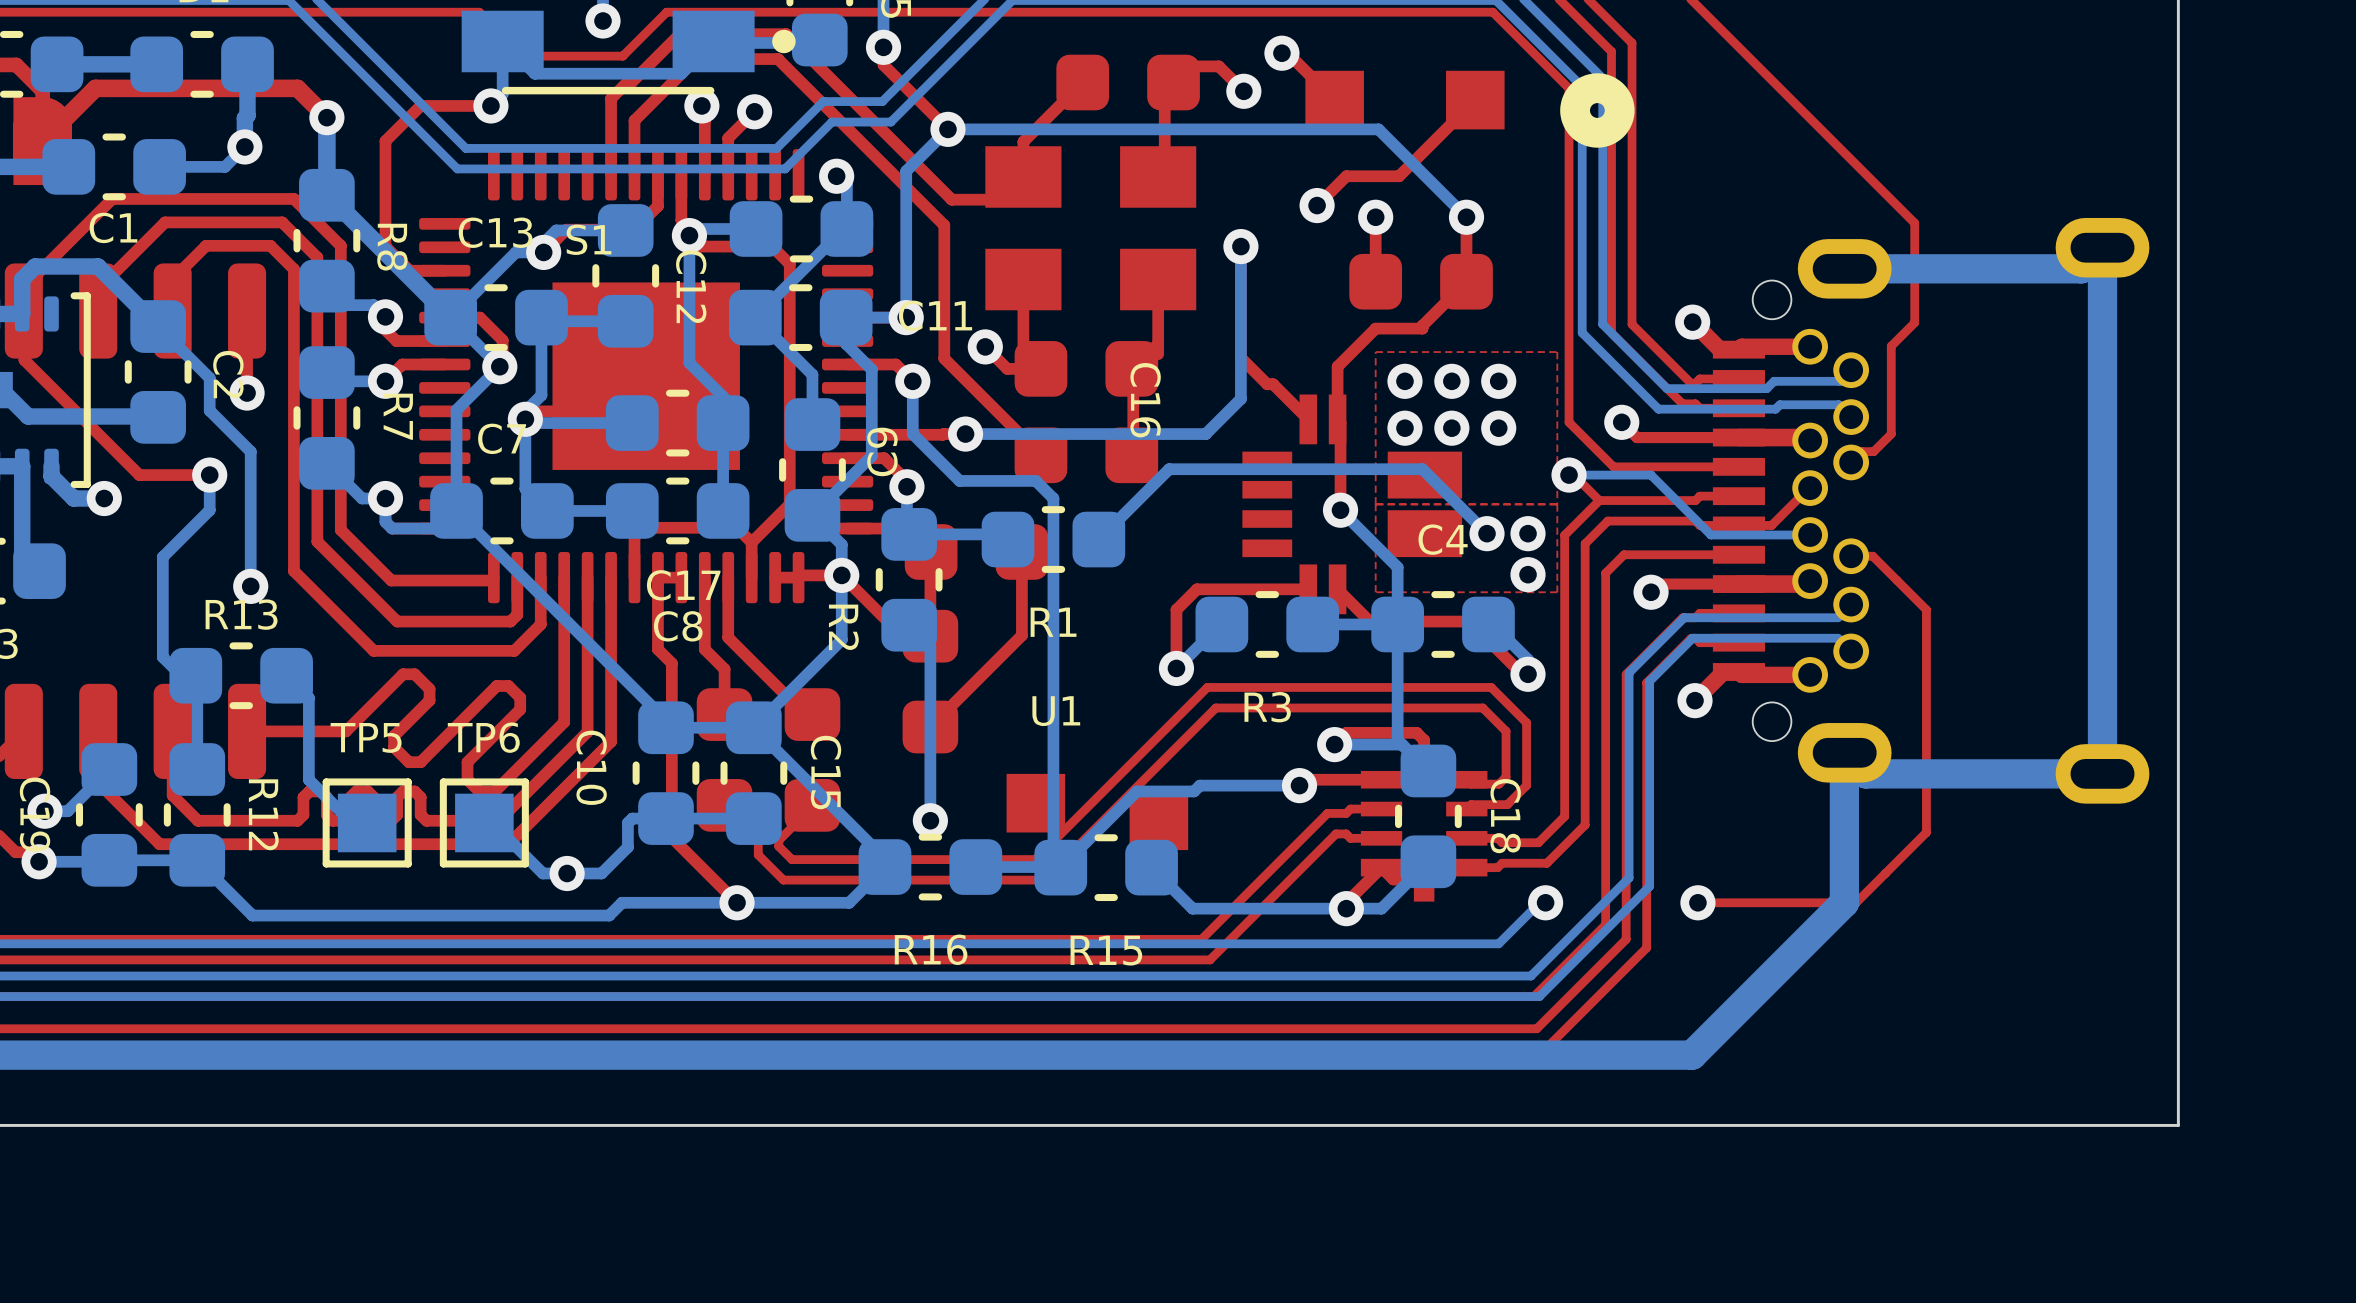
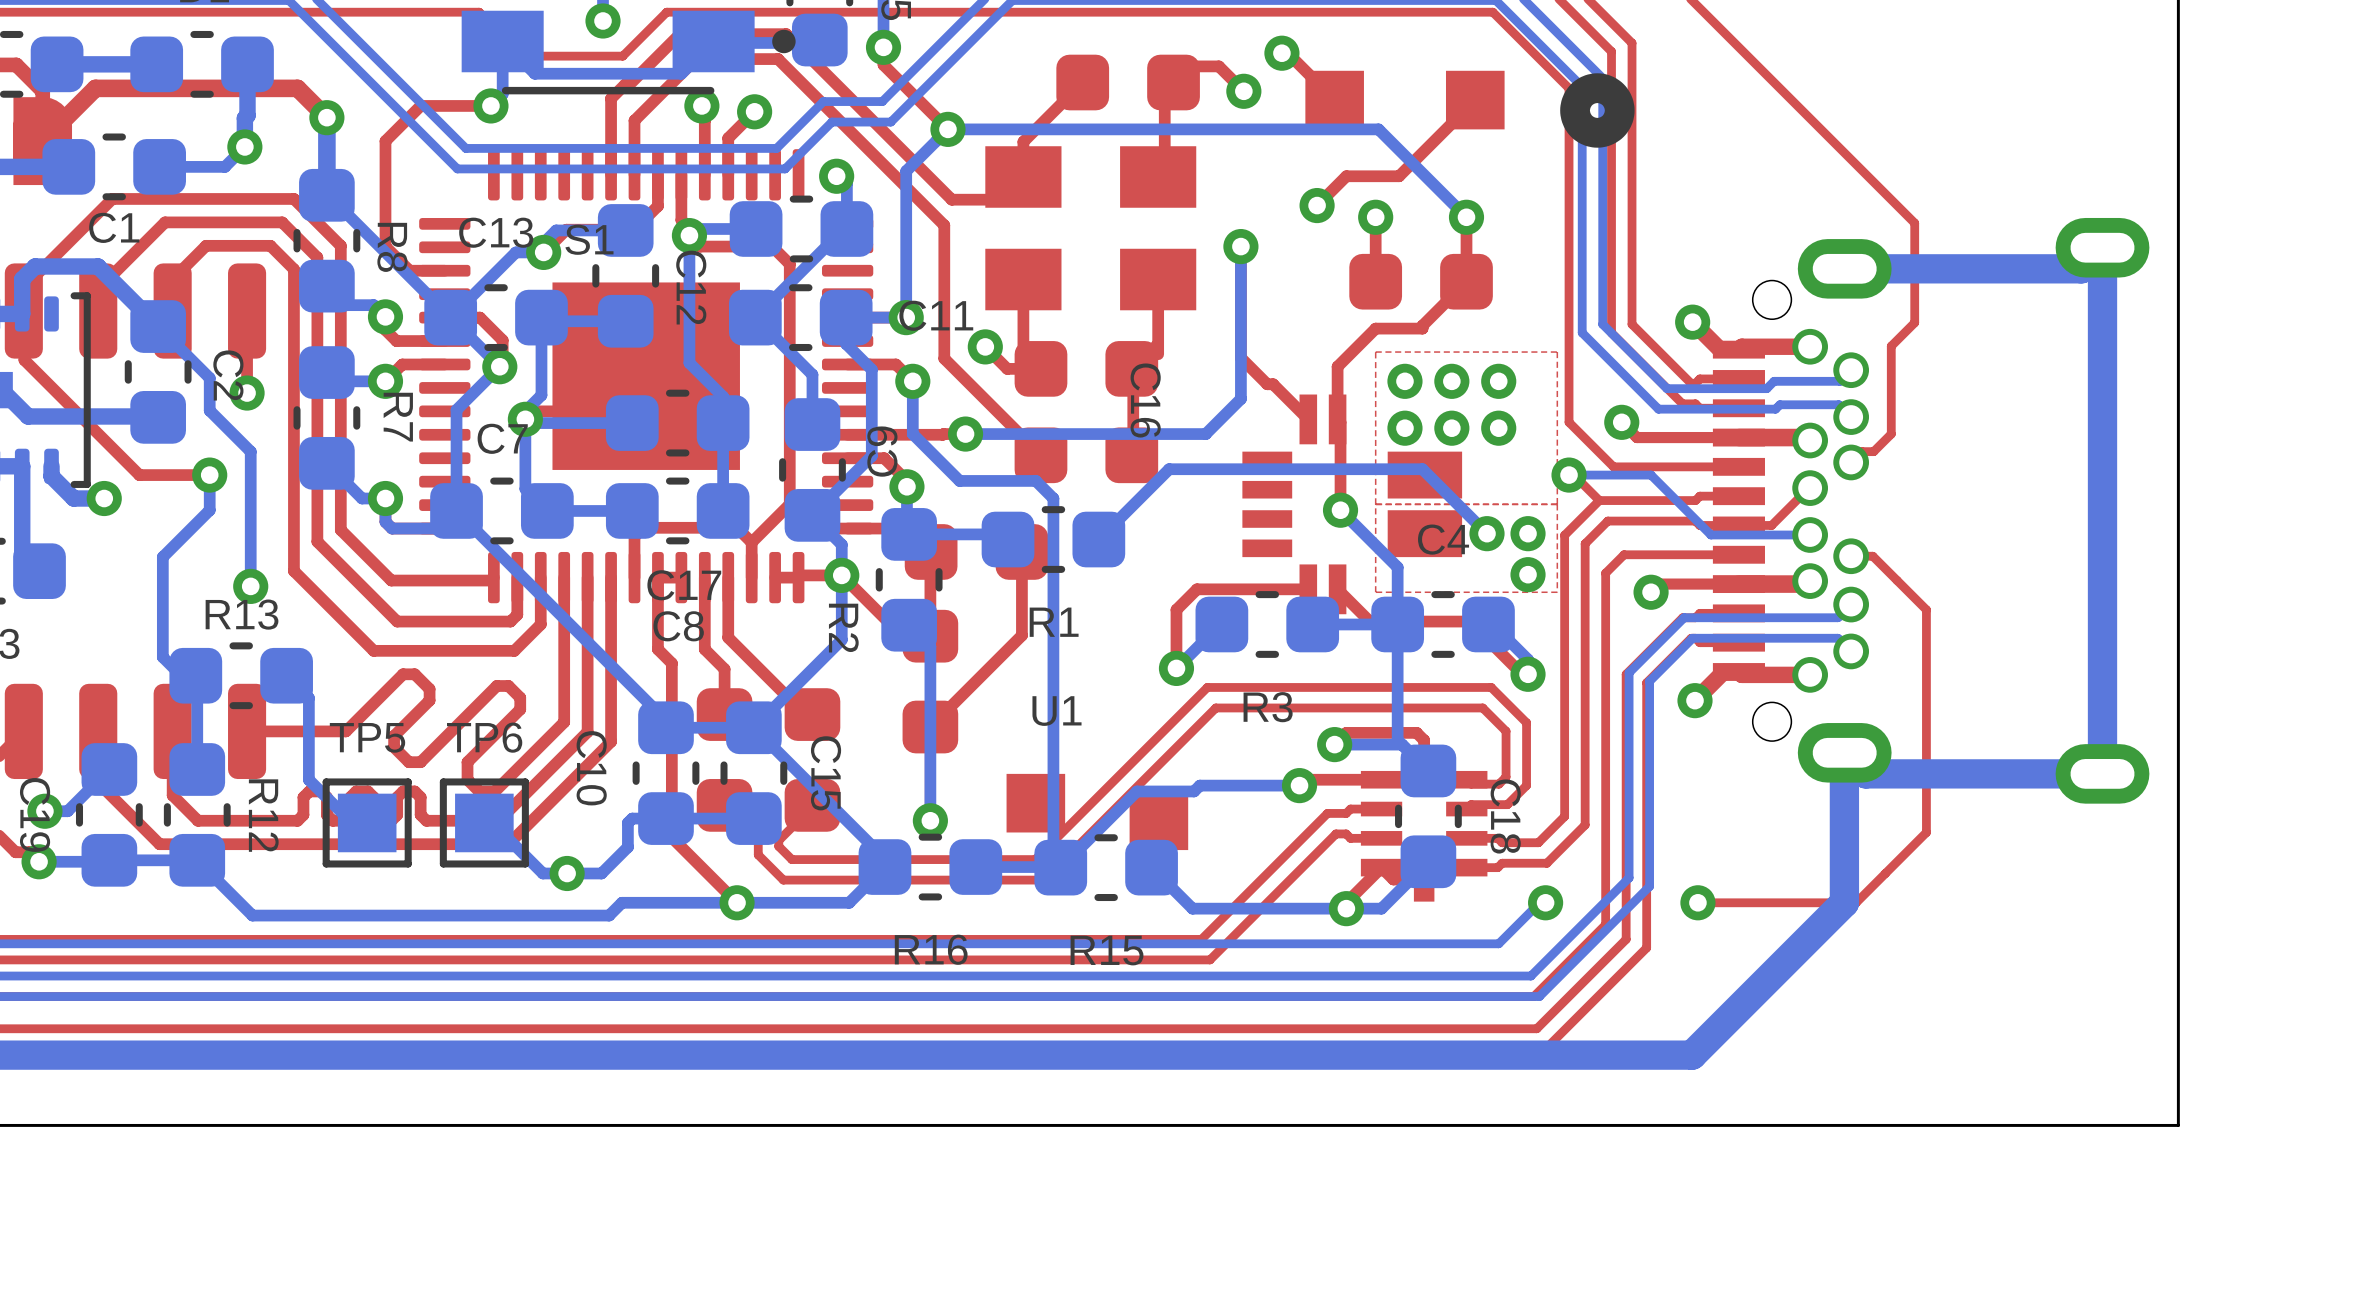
bottom track width: thick (326, 195) (450, 317) -> thin (326, 195) (450, 317)

